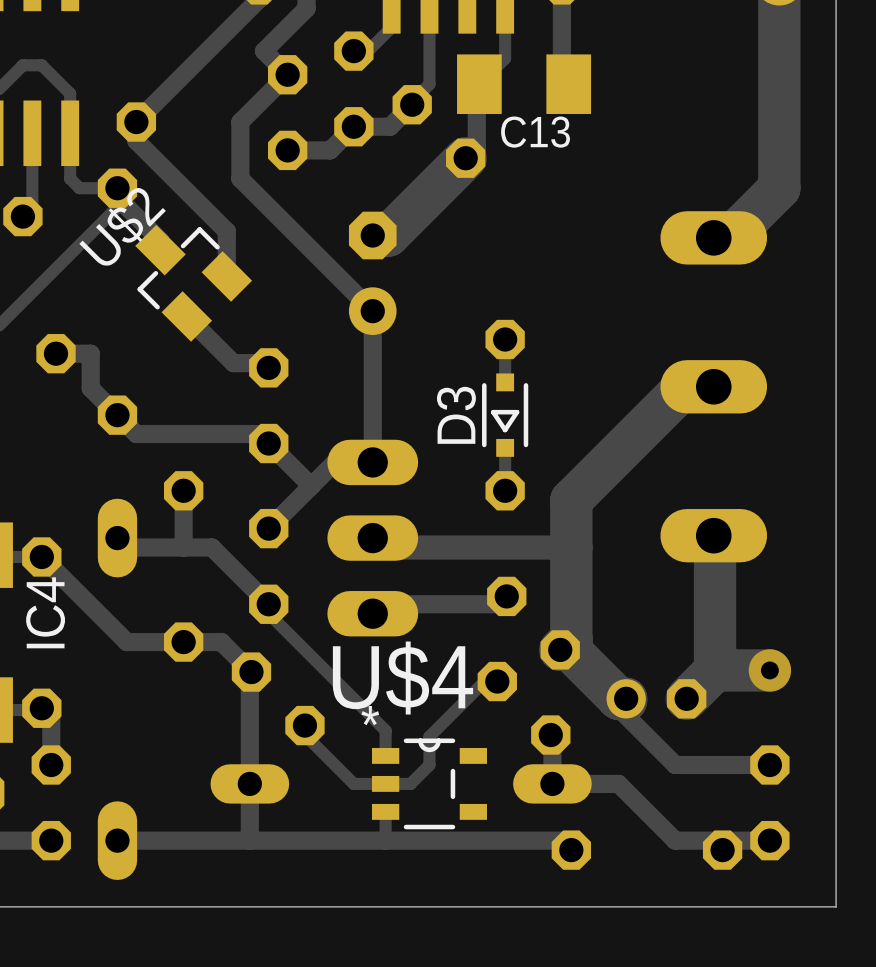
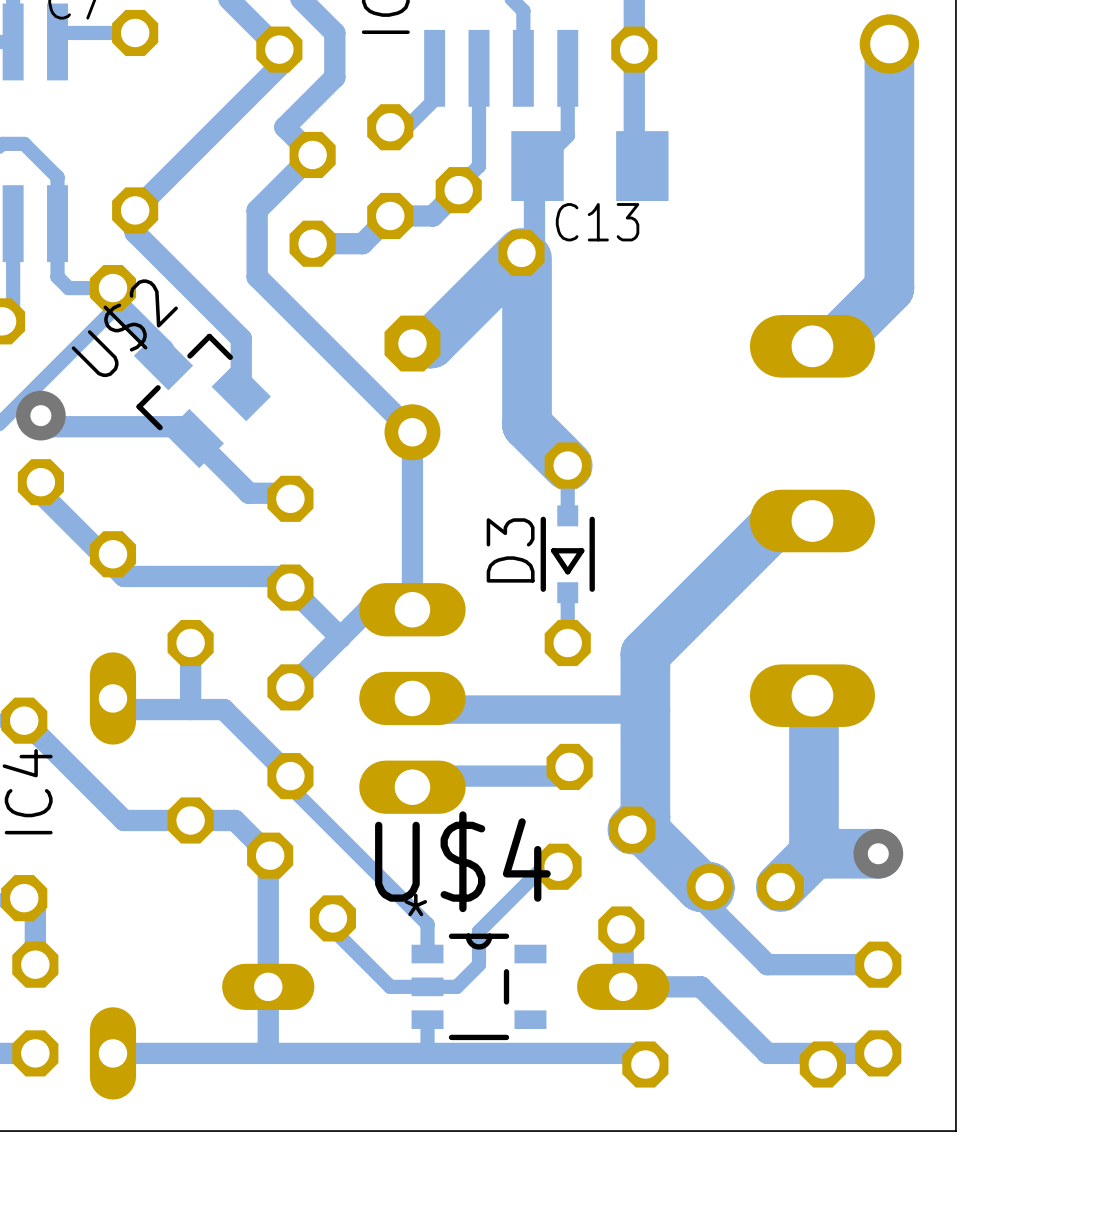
track: none -> (534, 239) (534, 258) (527, 258) (527, 424) (567, 465)
track: none -> (40, 415) (51, 426) (182, 426) (194, 438)
via: none -> (40, 415)
track: (56, 353) (90, 353) (90, 388) (136, 434) -> (40, 482) (40, 493) (124, 576) (135, 576)

